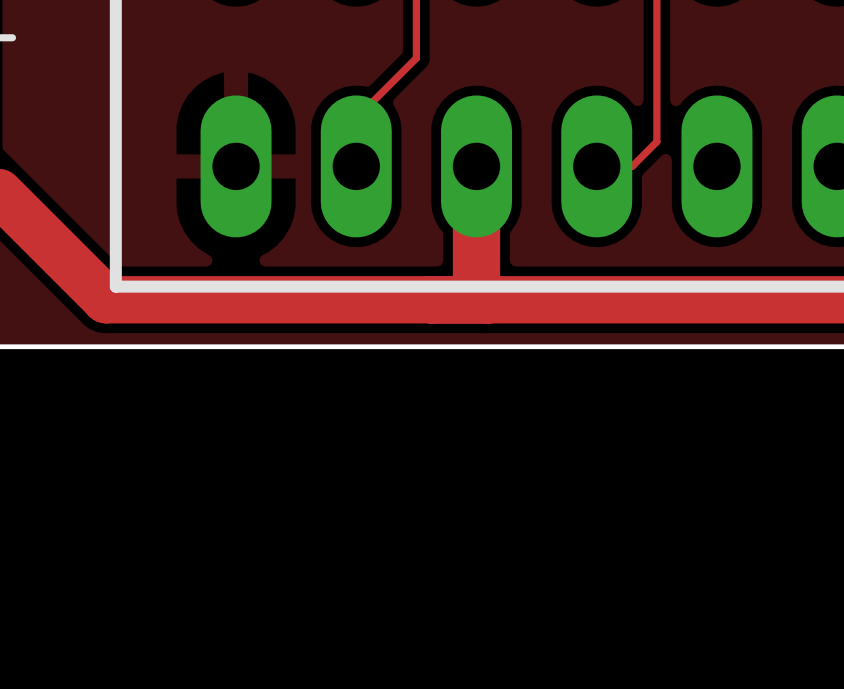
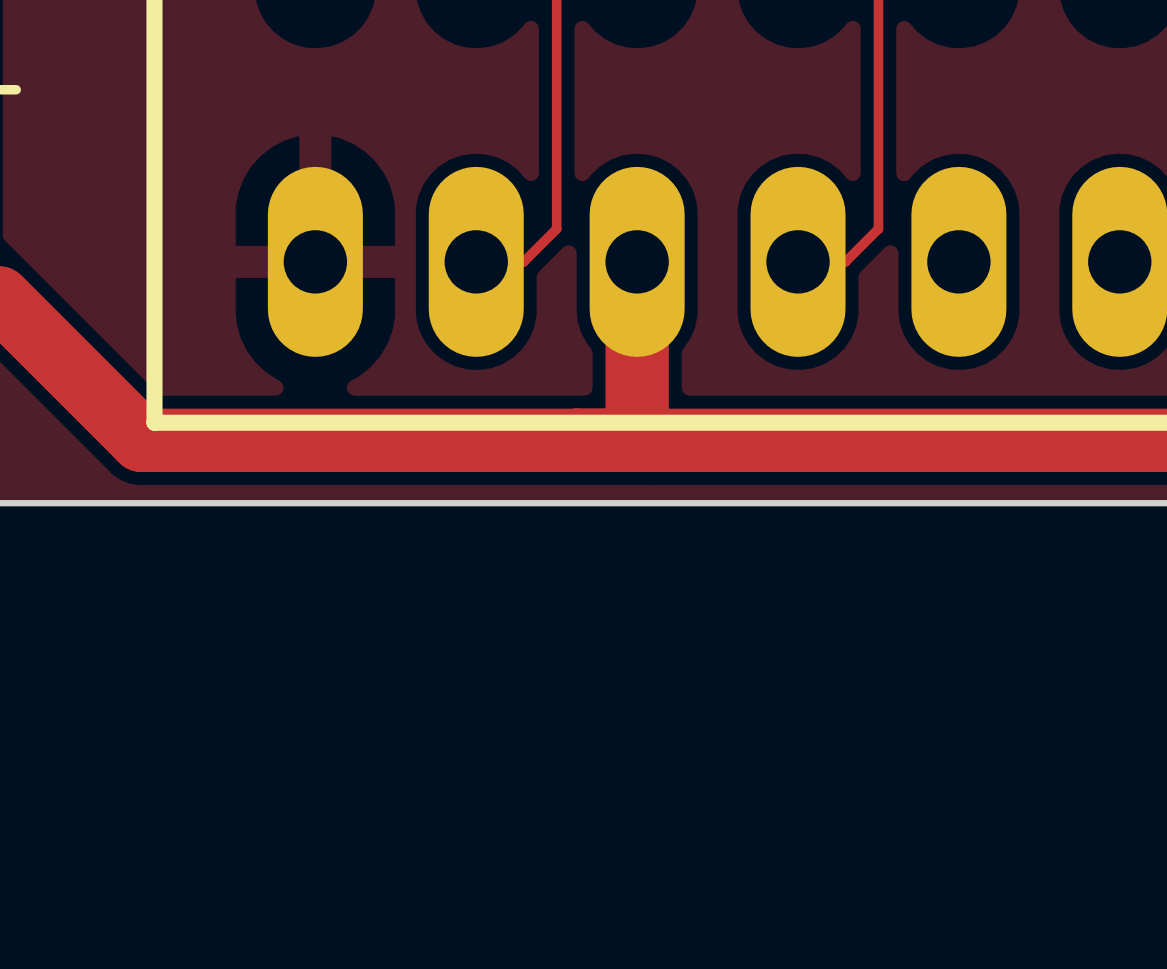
track: (416, 58) (356, 118) (356, 166) -> (556, 117) (556, 228) (523, 261) (476, 261)

